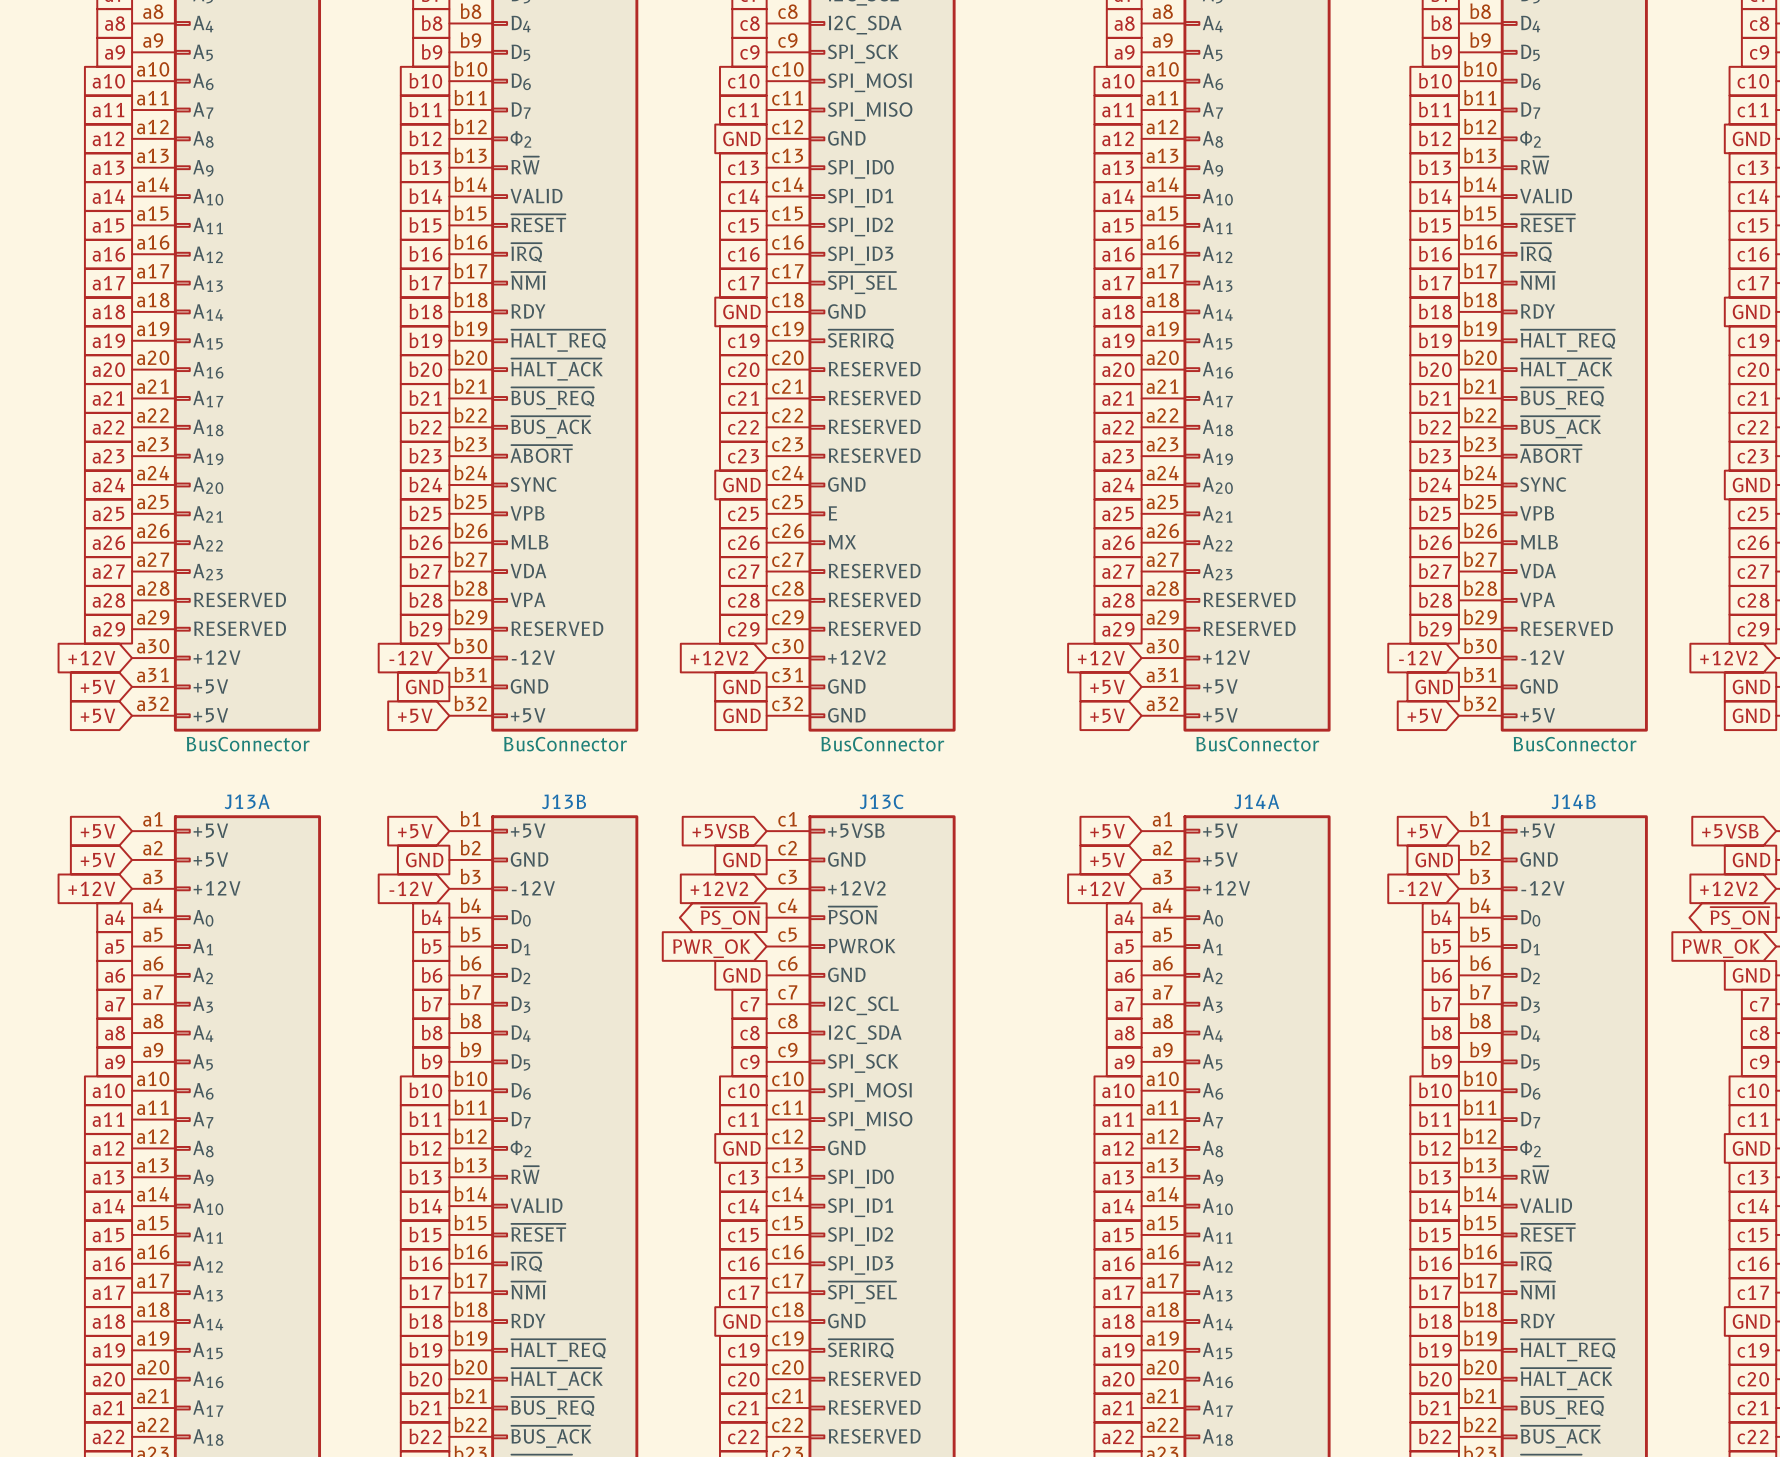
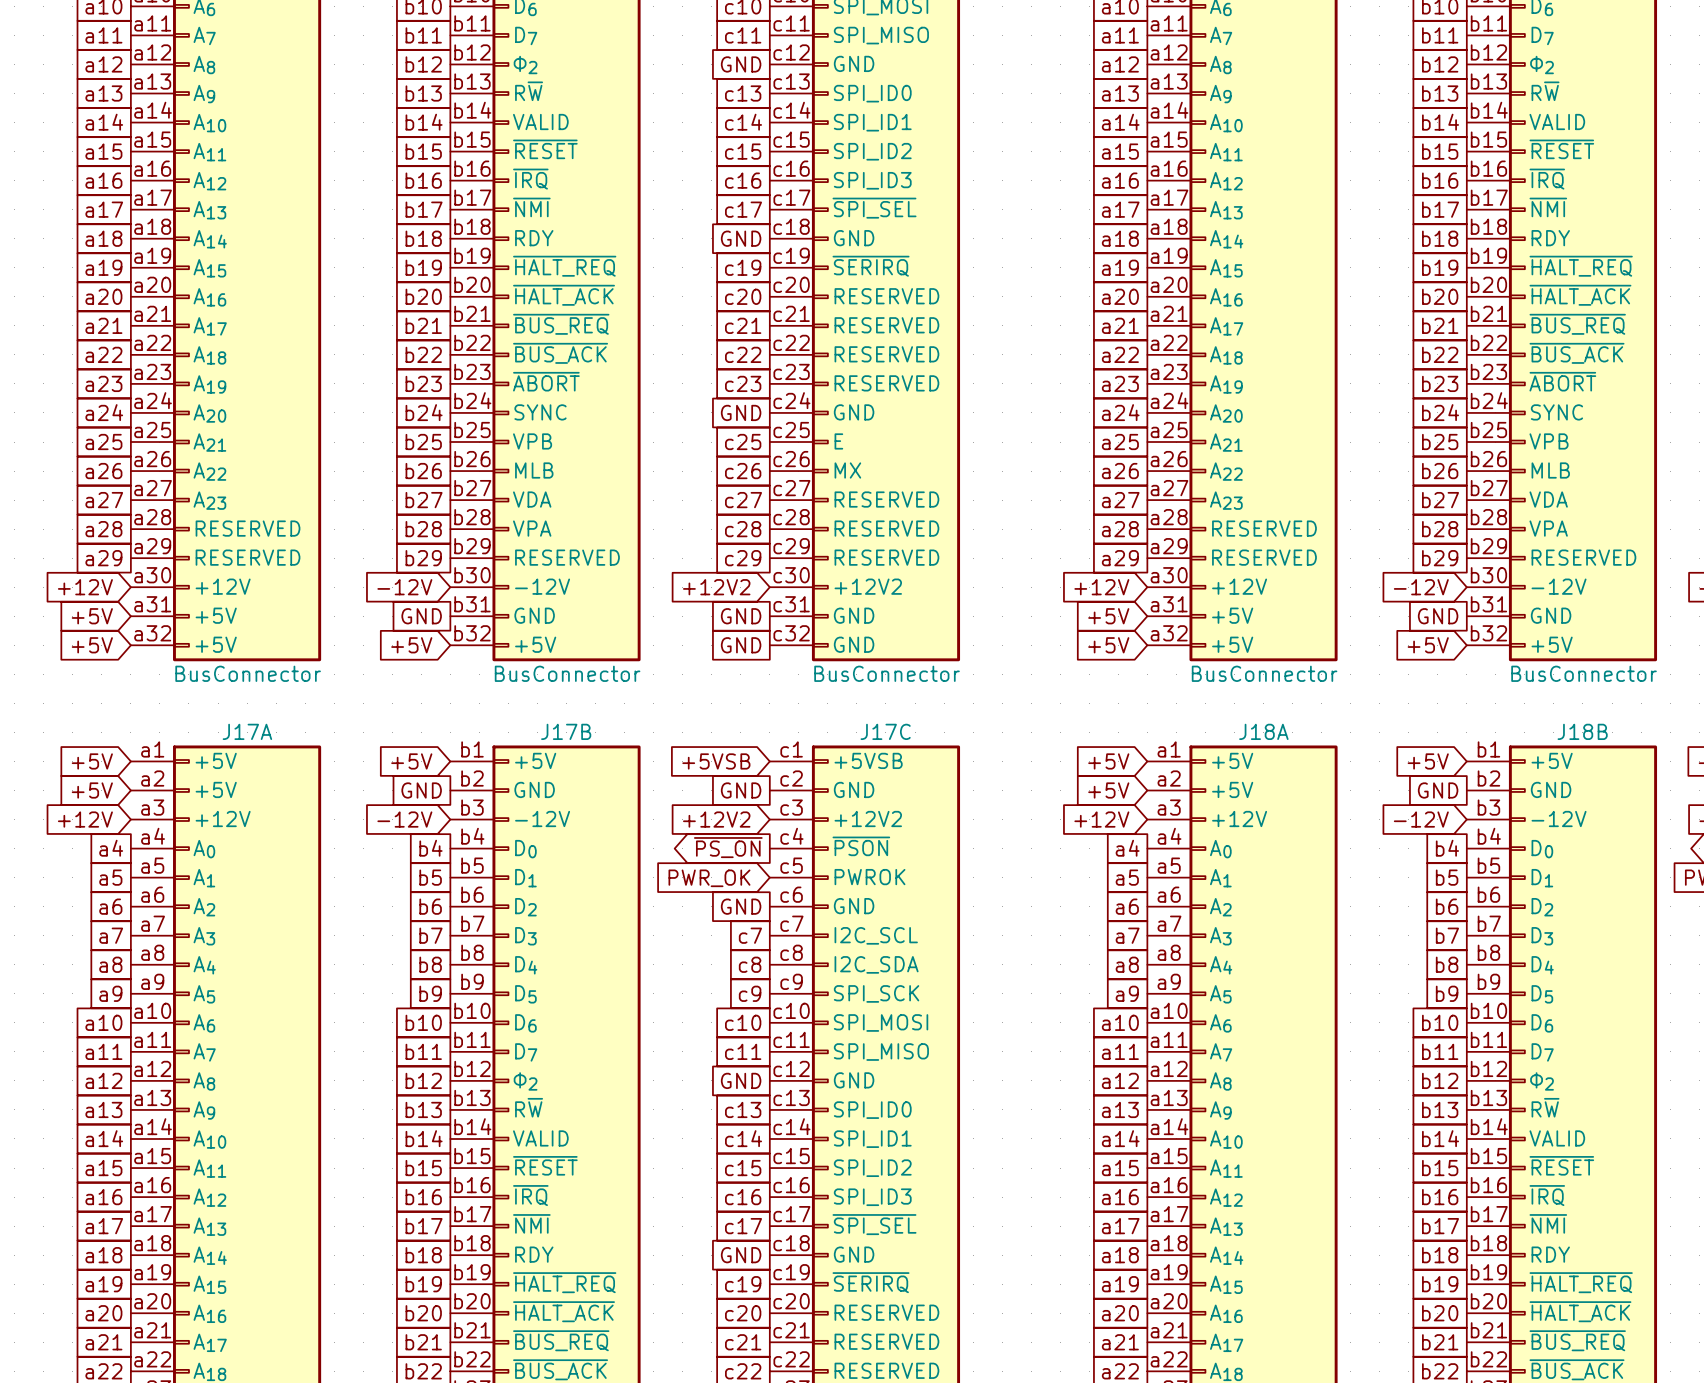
J13A name: J13A (247, 801) -> J17A (247, 731)
J13B name: J13B (563, 801) -> J17B (566, 731)
J13C name: J13C (881, 801) -> J17C (885, 731)
J14A name: J14A (1256, 801) -> J18A (1263, 731)
J14B name: J14B (1573, 801) -> J18B (1582, 731)

